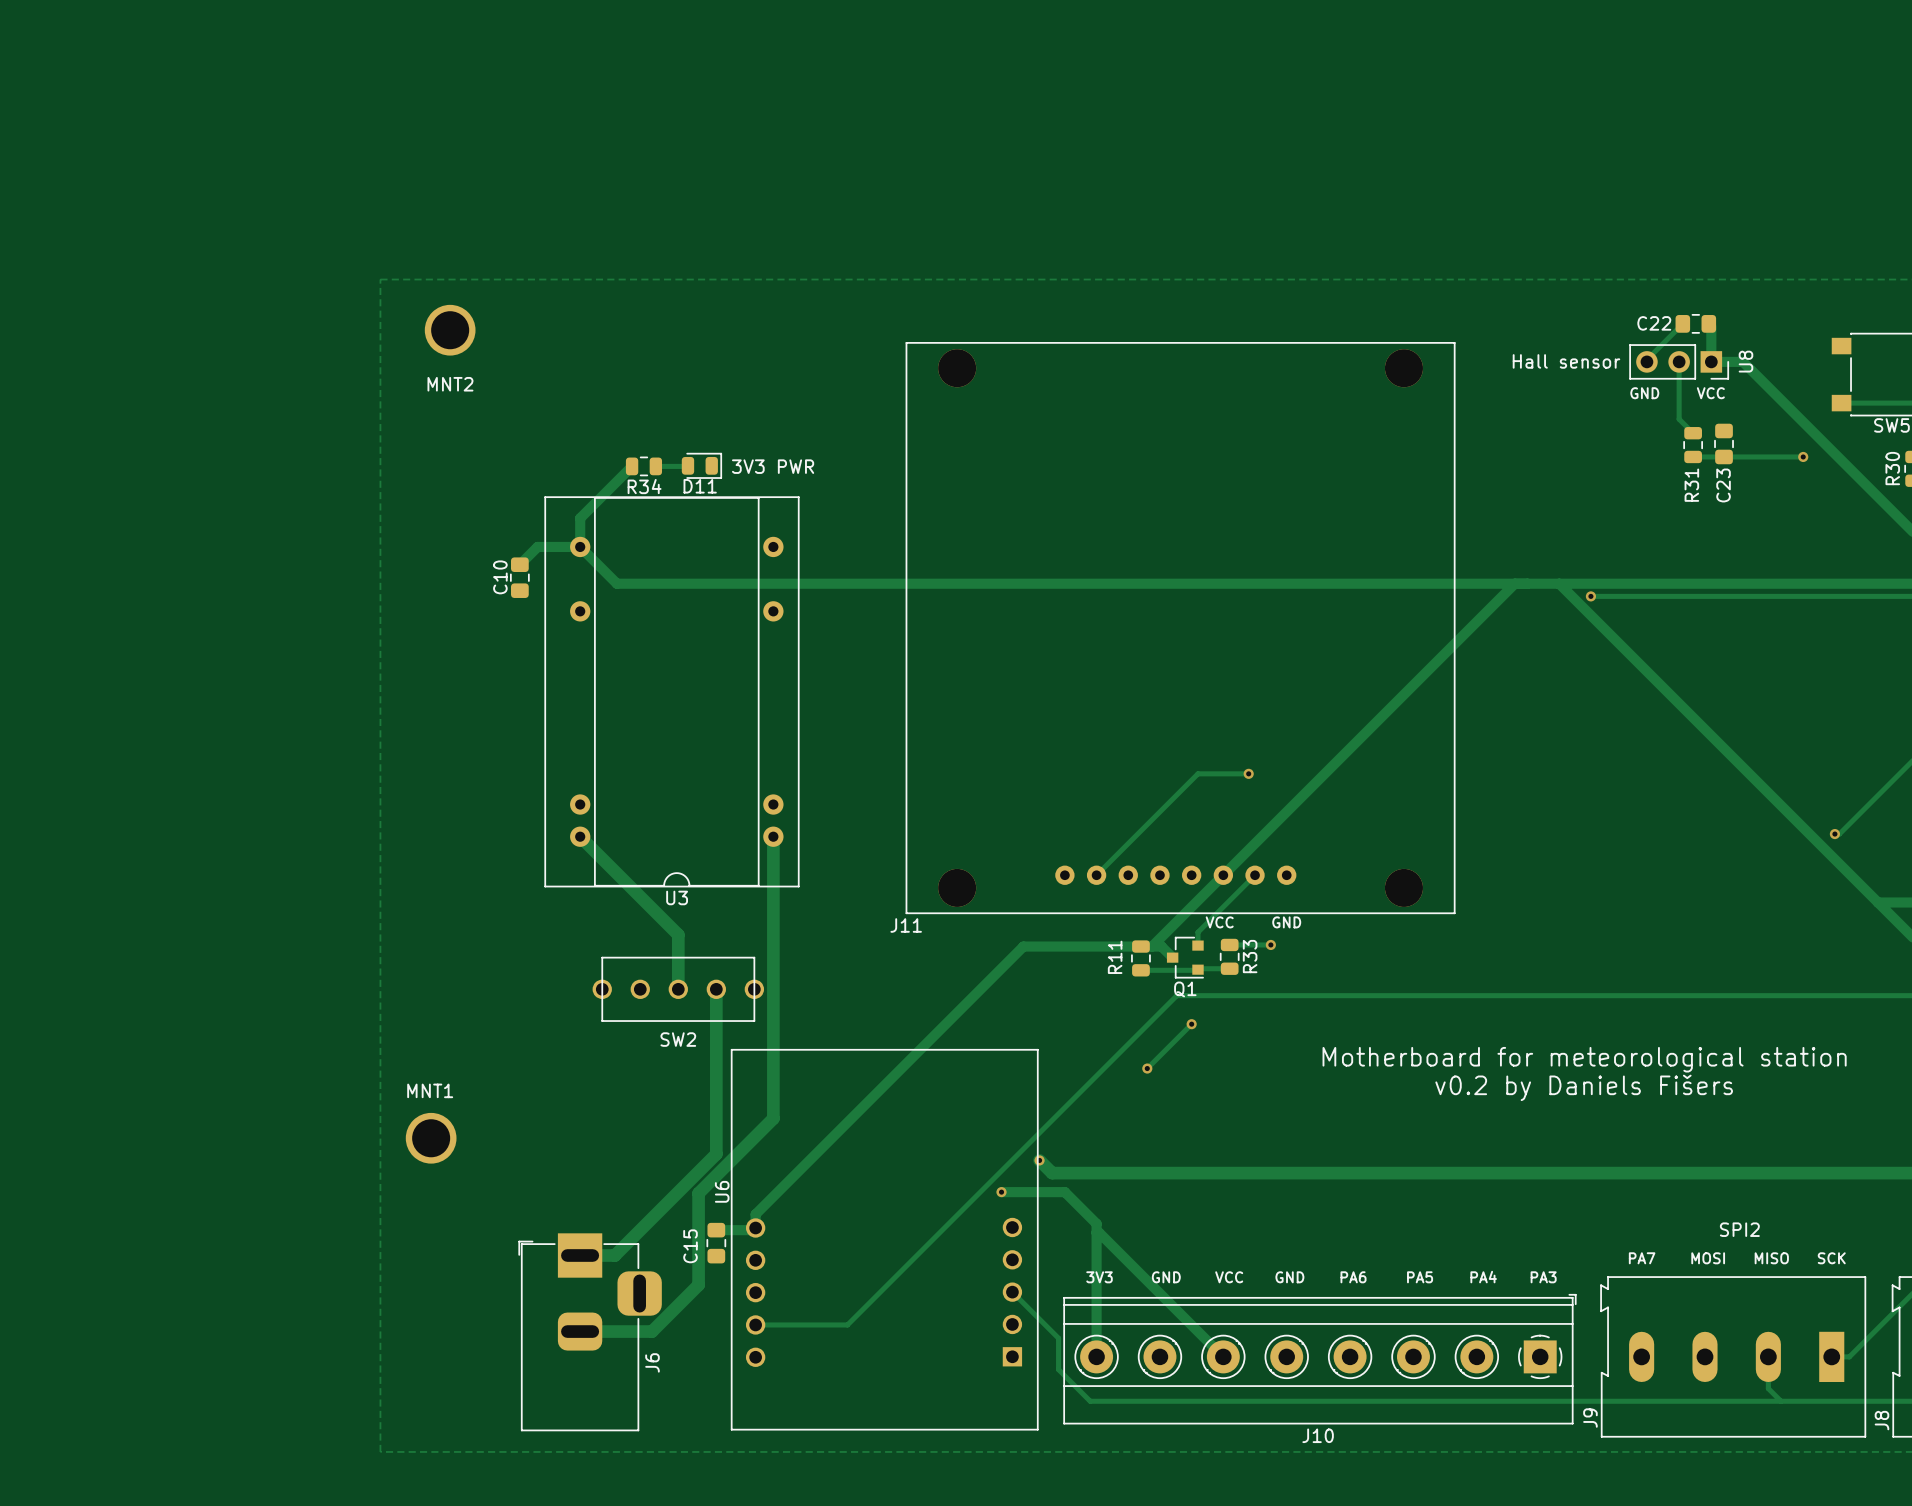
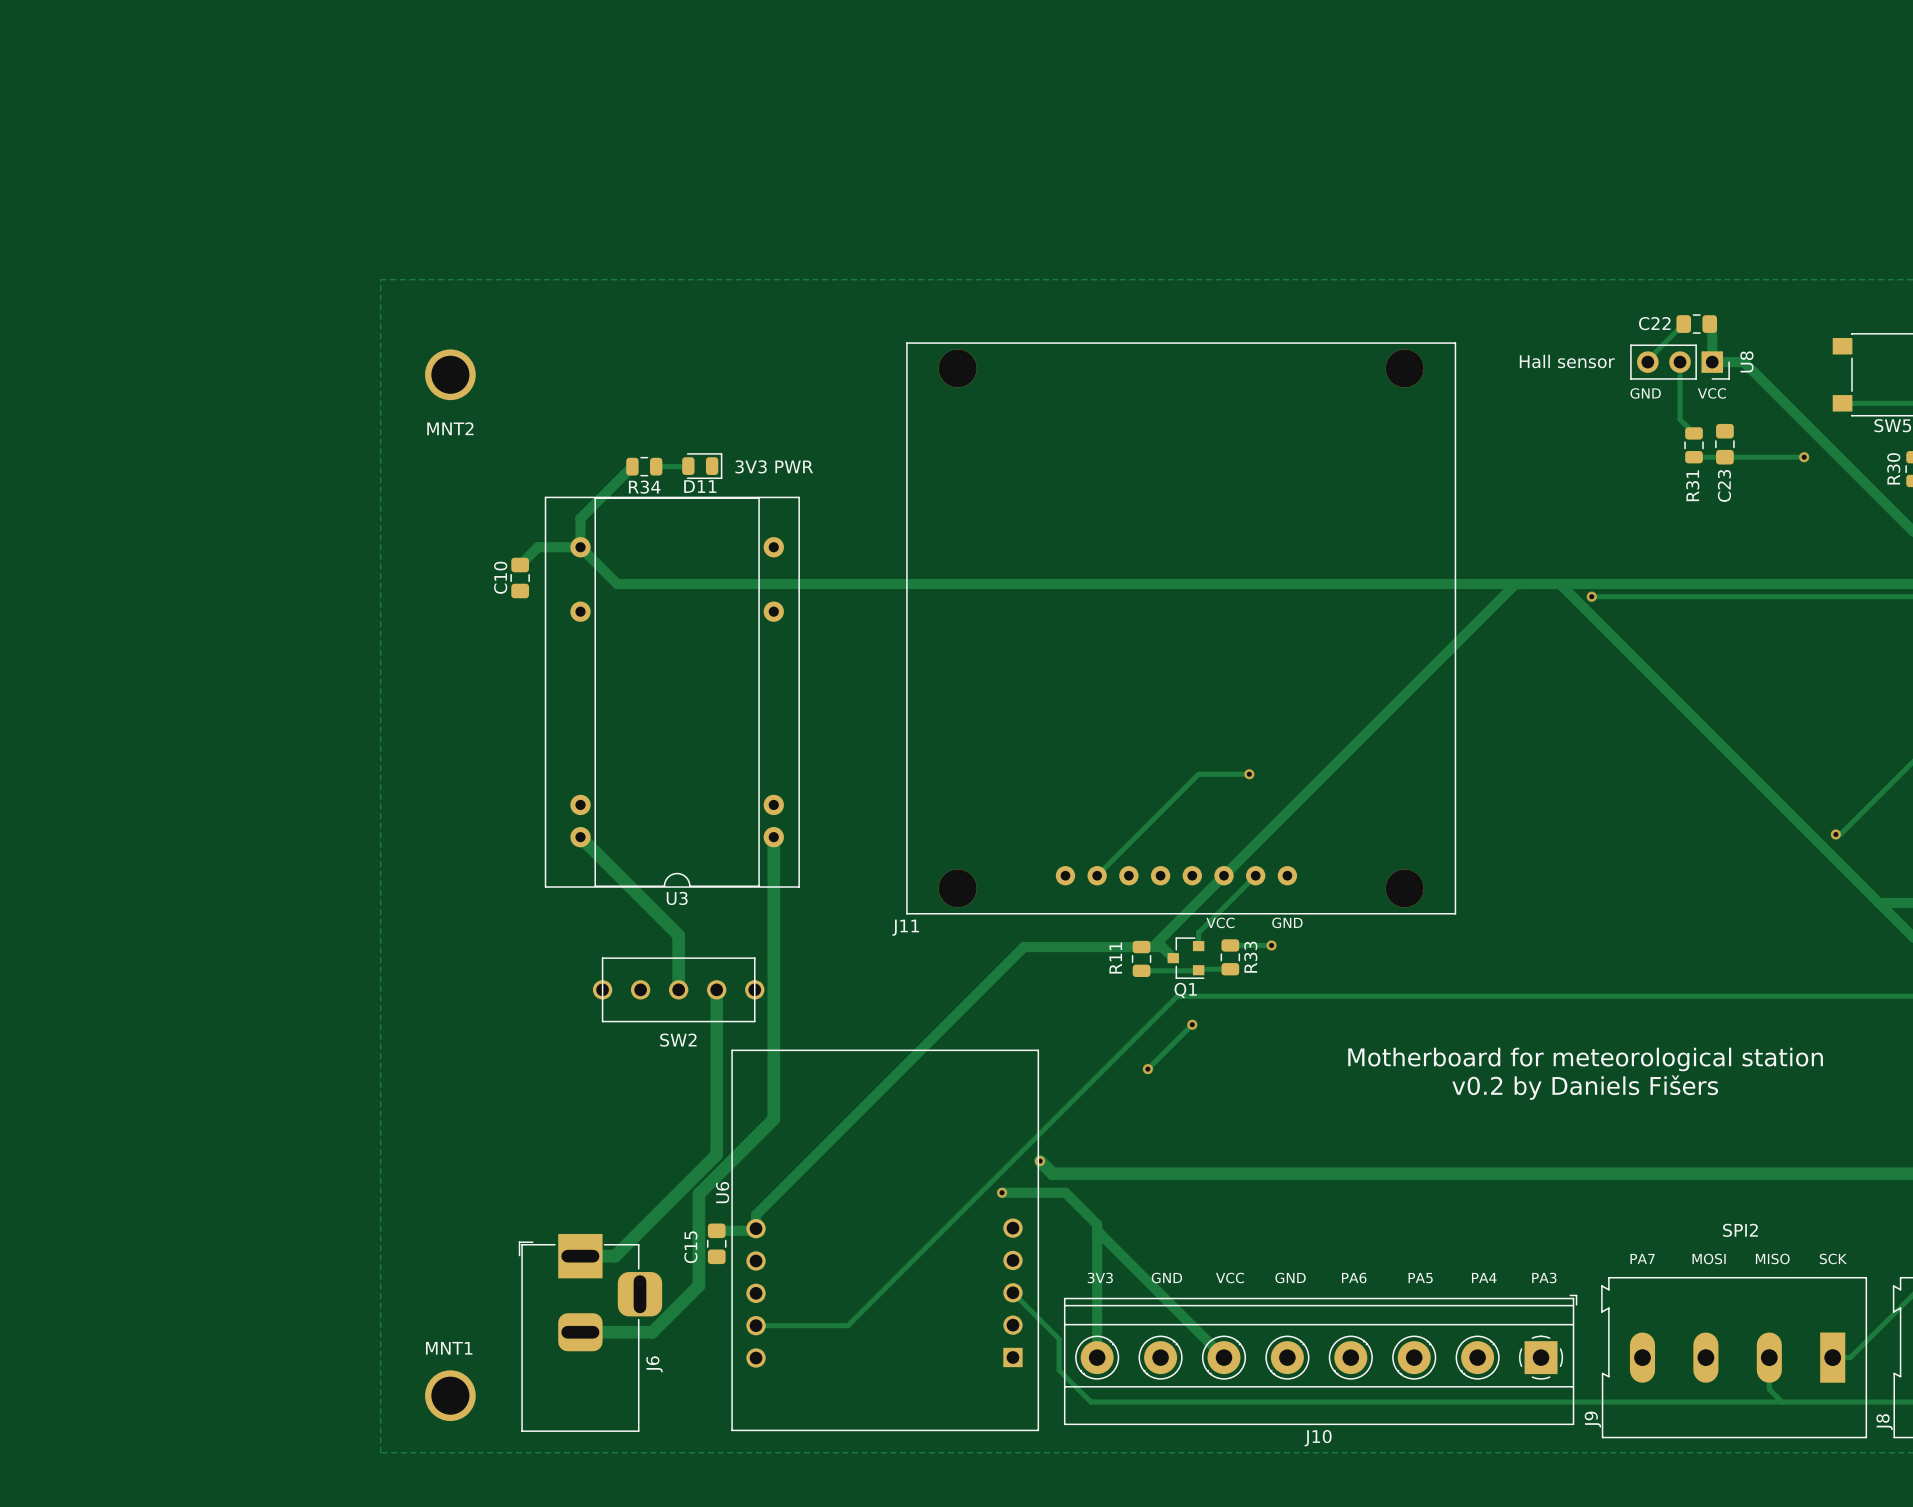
MNT2 position: (450, 330) -> (450, 374)
MNT1 position: (431, 1138) -> (450, 1395)

